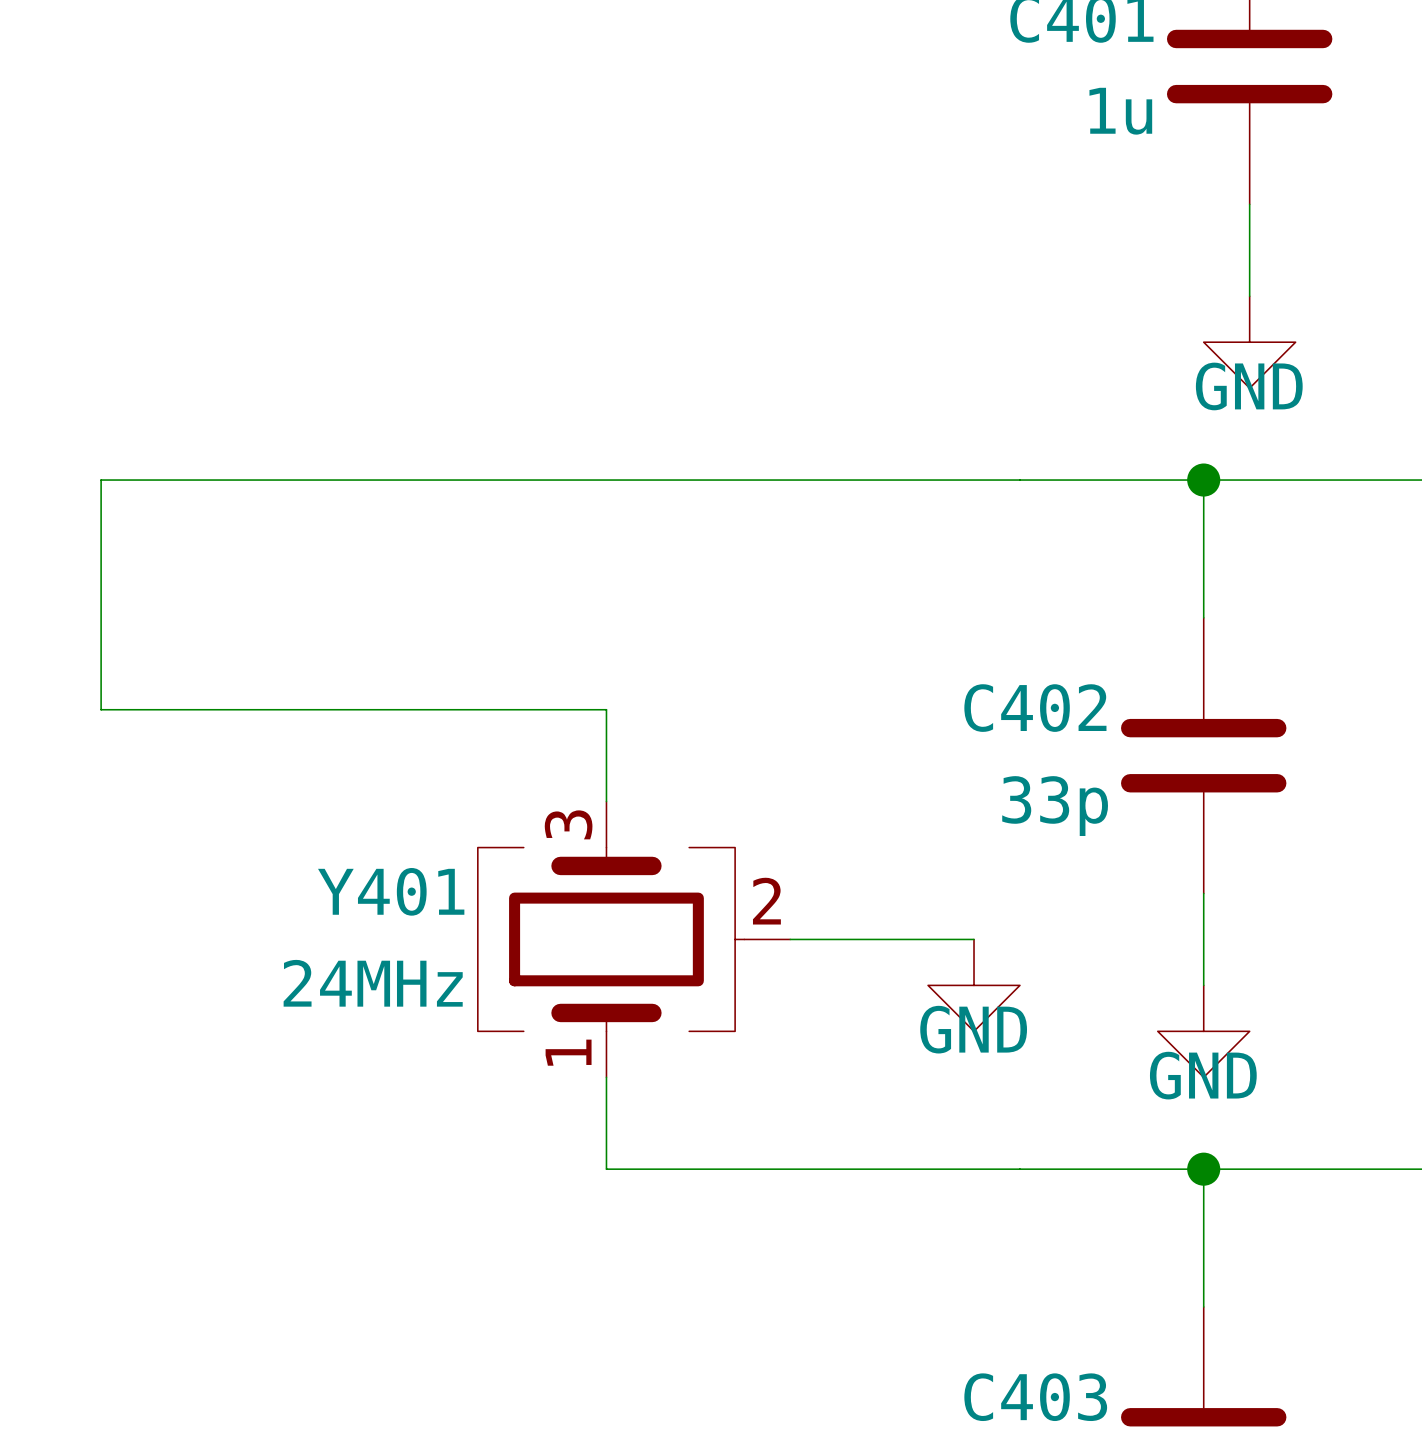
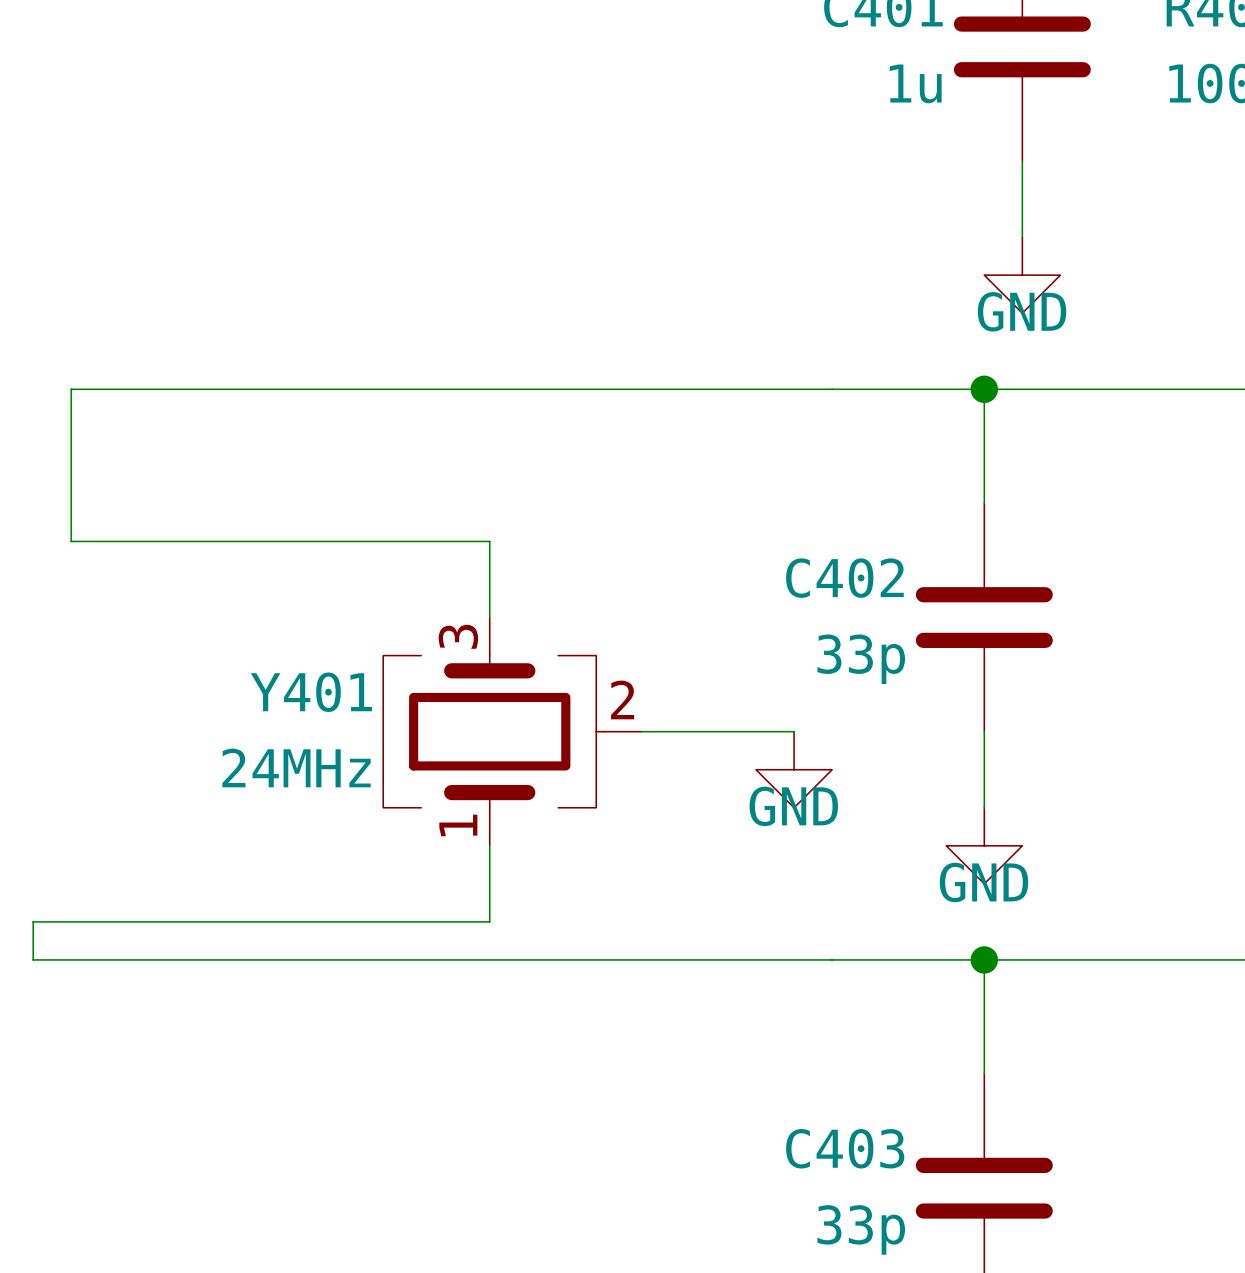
wire: (101, 663) (101, 709) (606, 709) -> (71, 541) (489, 541) (489, 579)
Y401 position: (634, 939) -> (512, 731)
wire: (790, 939) (974, 939) -> (641, 731) (794, 731)
power symbol position: GND (974, 985) -> GND (794, 769)
wire: (606, 1123) (606, 1169) -> (489, 921) (33, 921) (33, 959) (489, 959)

